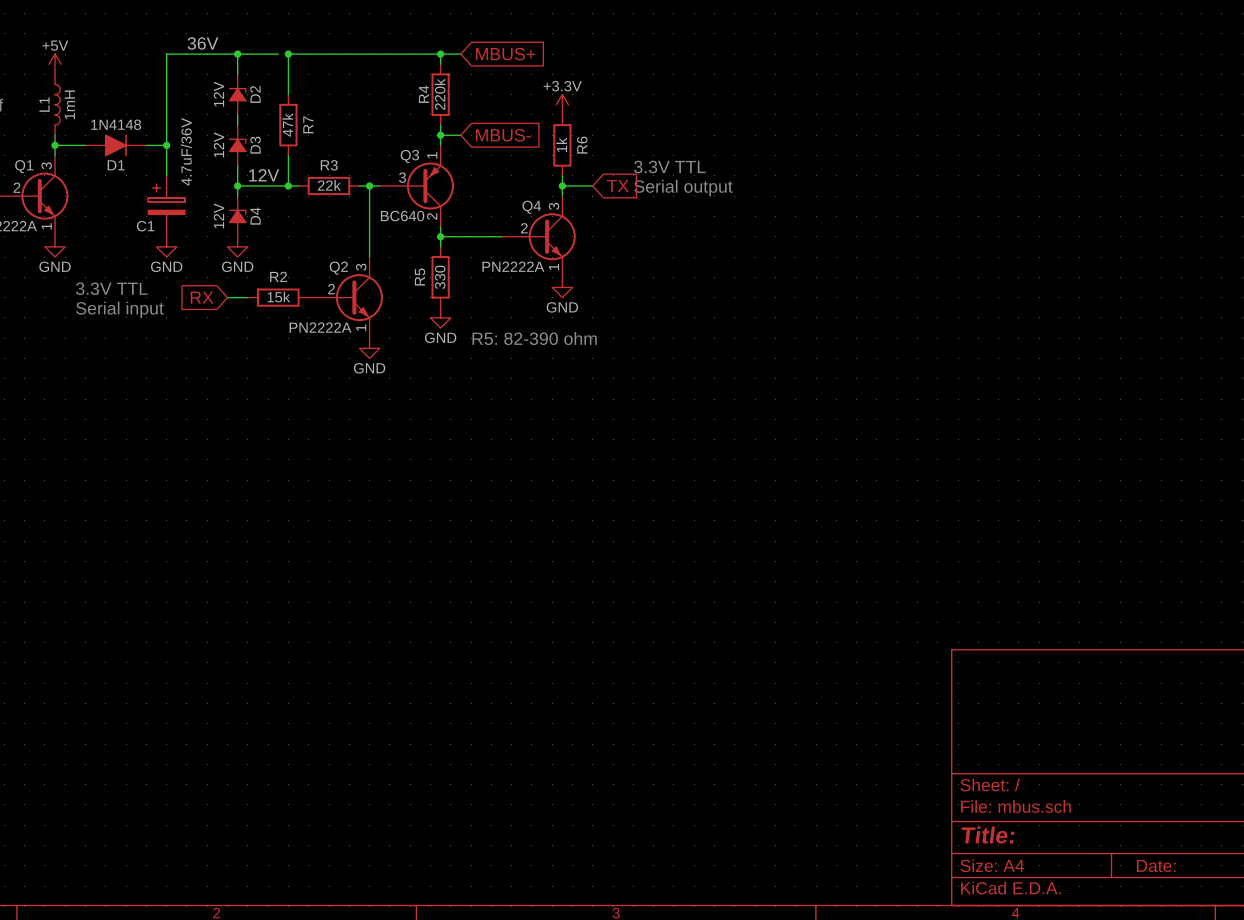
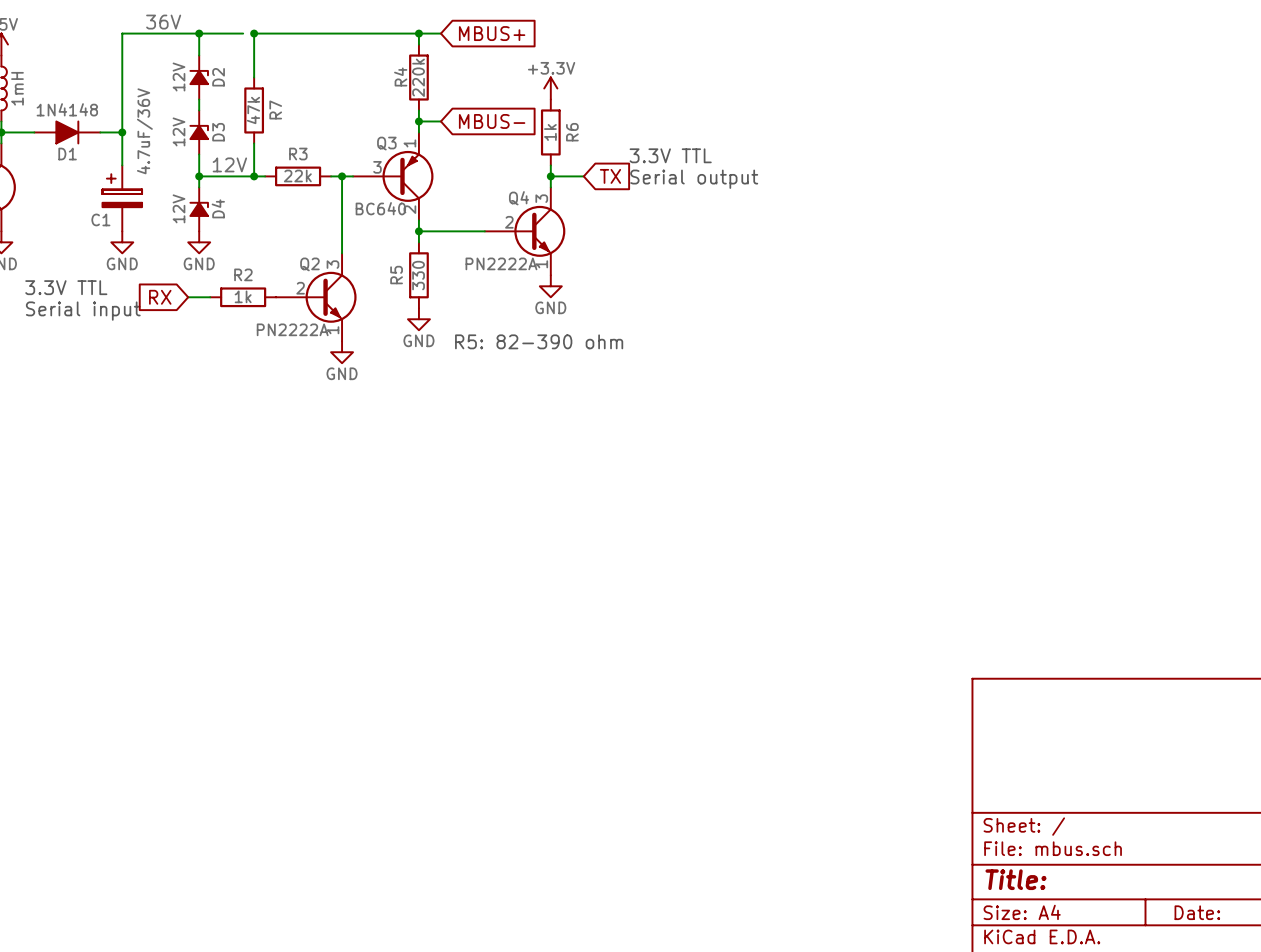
R2 value: 15k (278, 297) -> 1k (243, 296)

